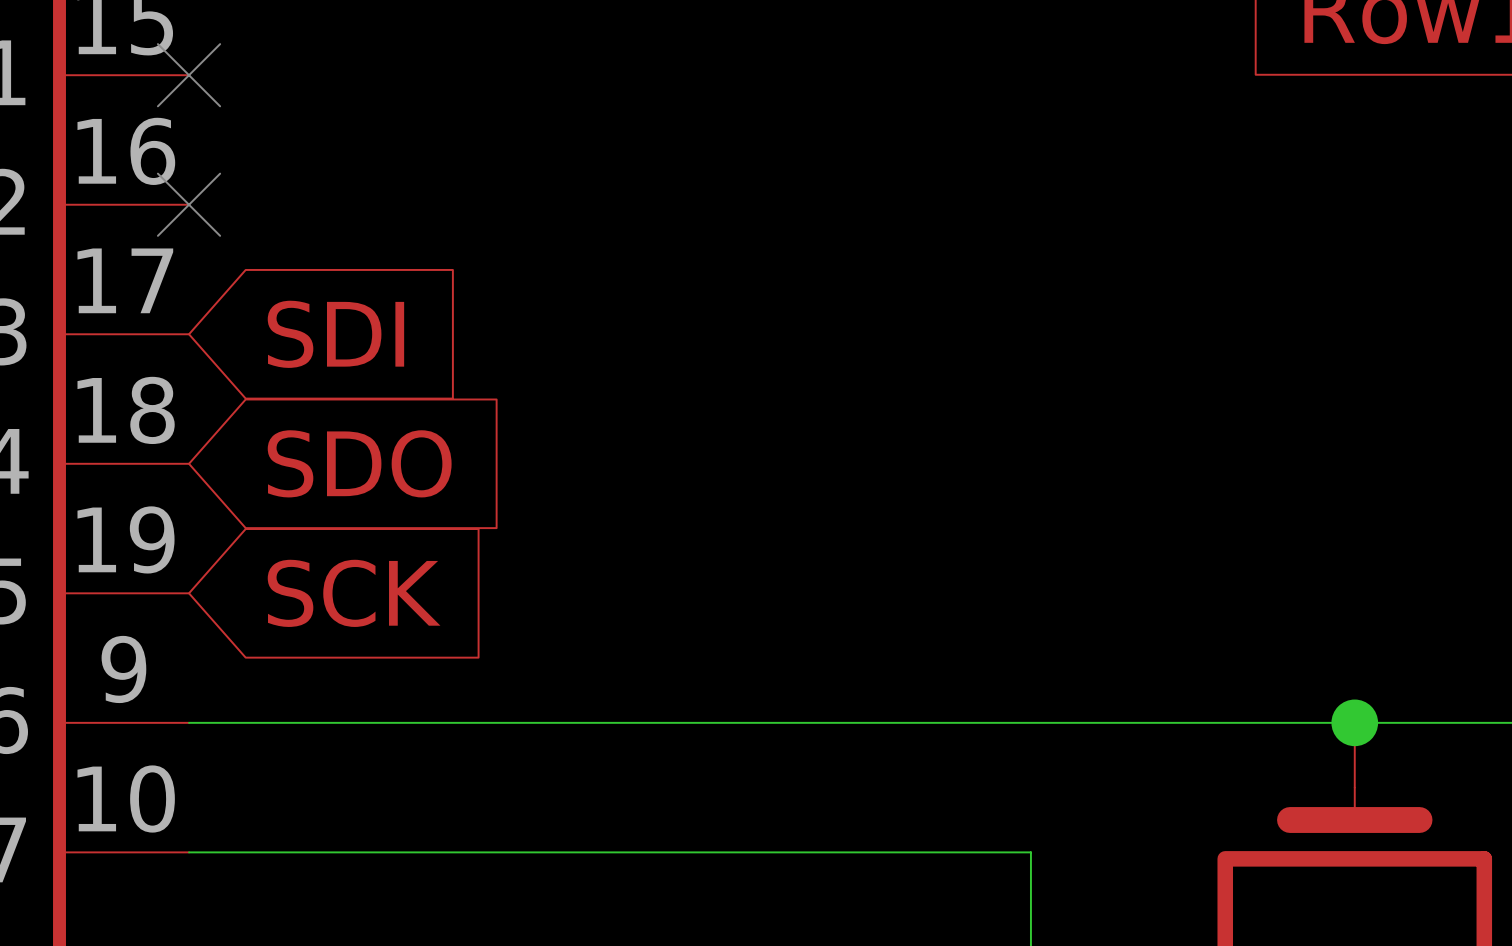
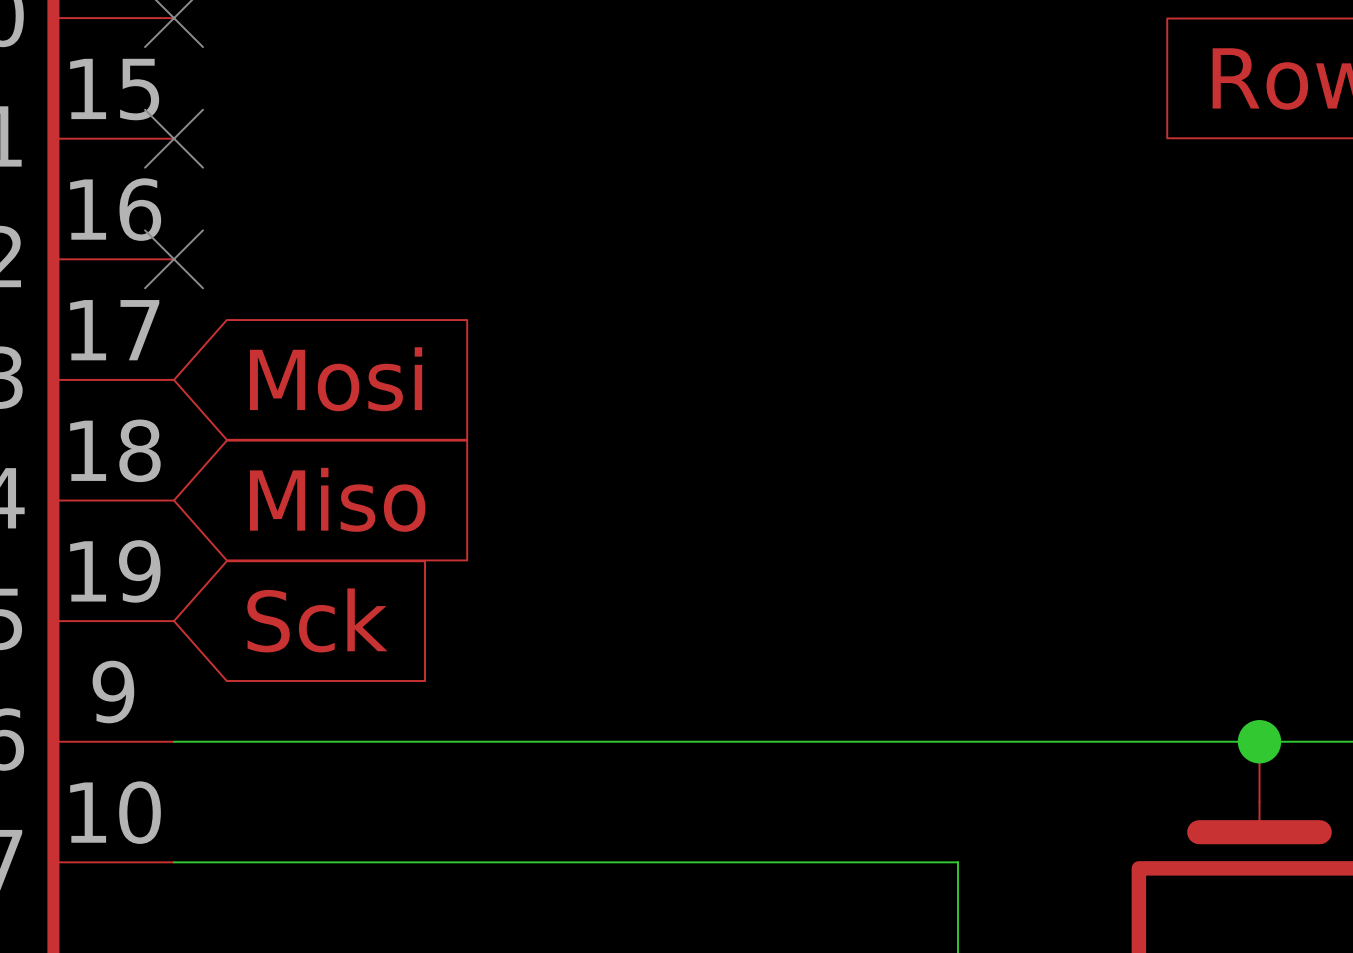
global label: SDI (335, 334) -> Mosi (336, 379)
global label: SDO (359, 463) -> Miso (337, 499)
global label: SCK (354, 593) -> Sck (317, 620)

